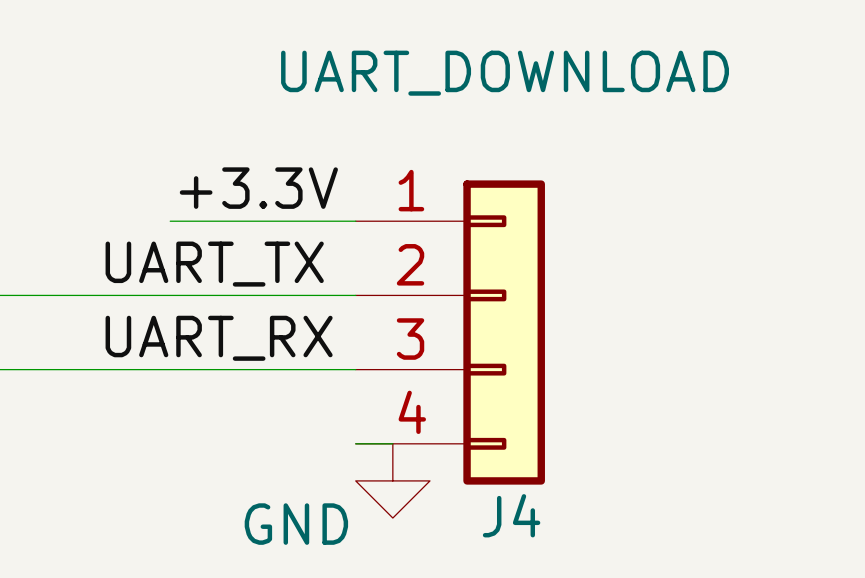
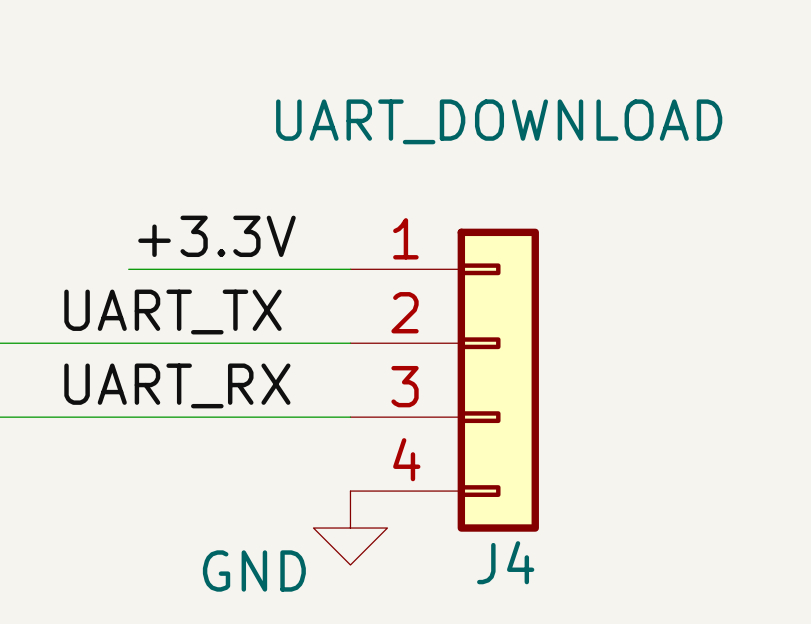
J4 position: (450, 332) -> (444, 380)

